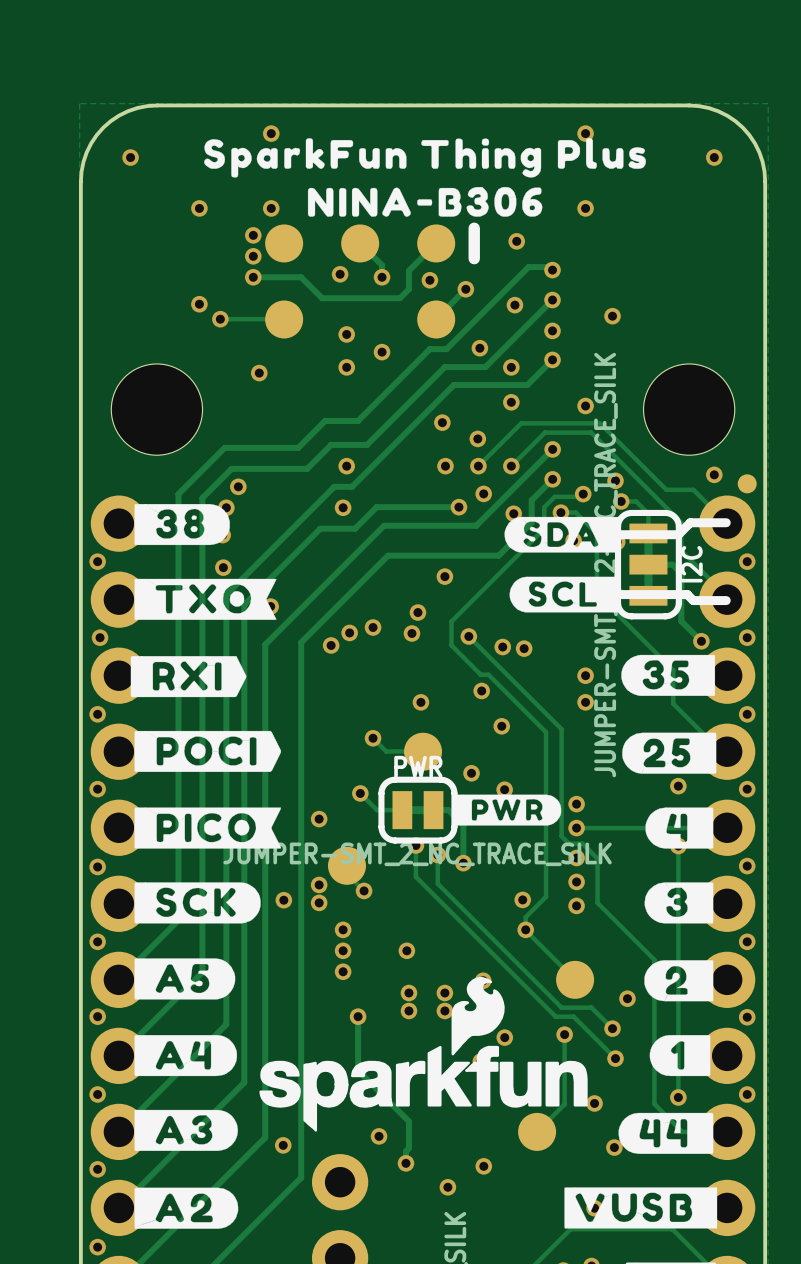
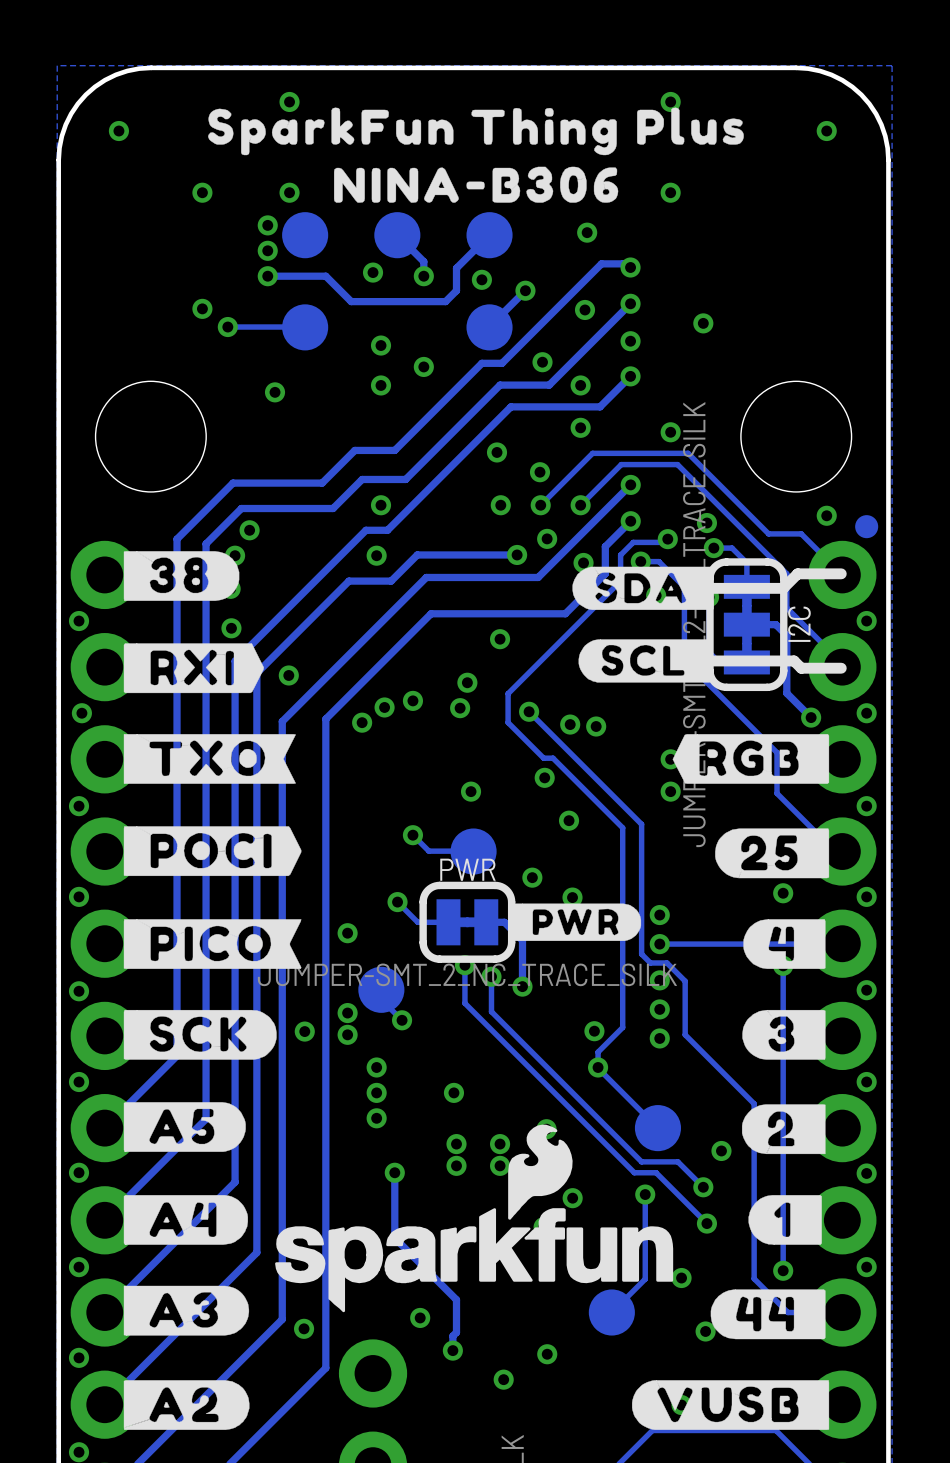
part footprint: [265, 222, 480, 339] -> [282, 212, 513, 351]
drawing position: (205, 599) -> (209, 758)
drawing shape: [621, 654, 716, 696] -> [672, 734, 830, 784]
drawing position: (188, 676) -> (193, 668)
drawing shape: [564, 1187, 718, 1229] -> [632, 1380, 830, 1430]

